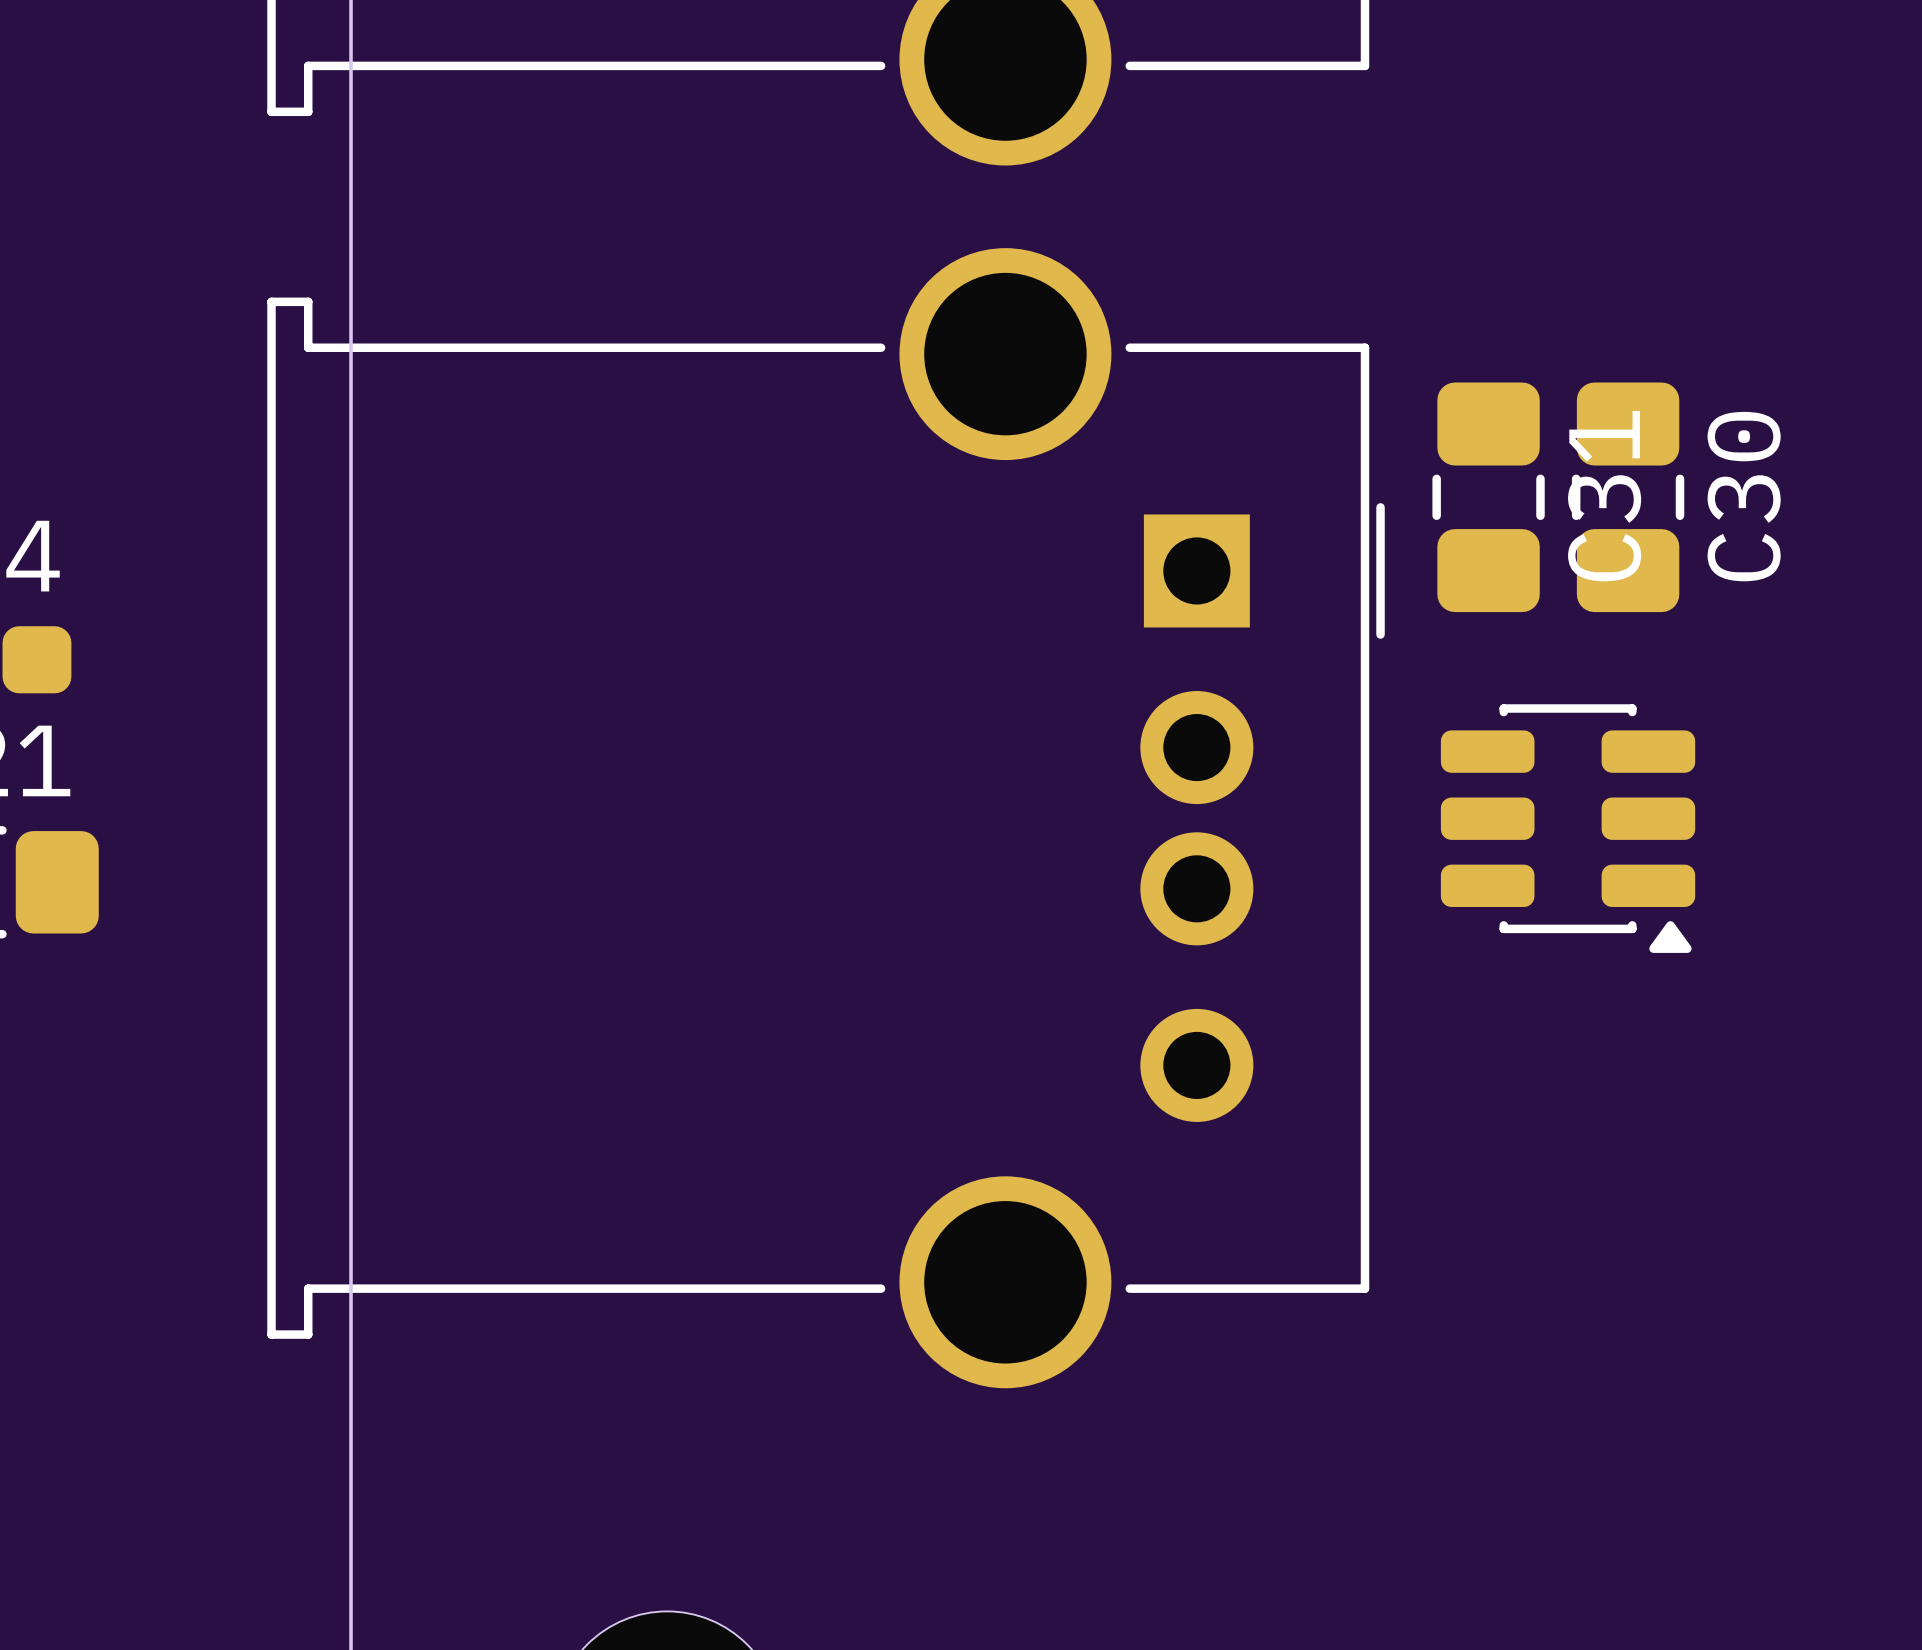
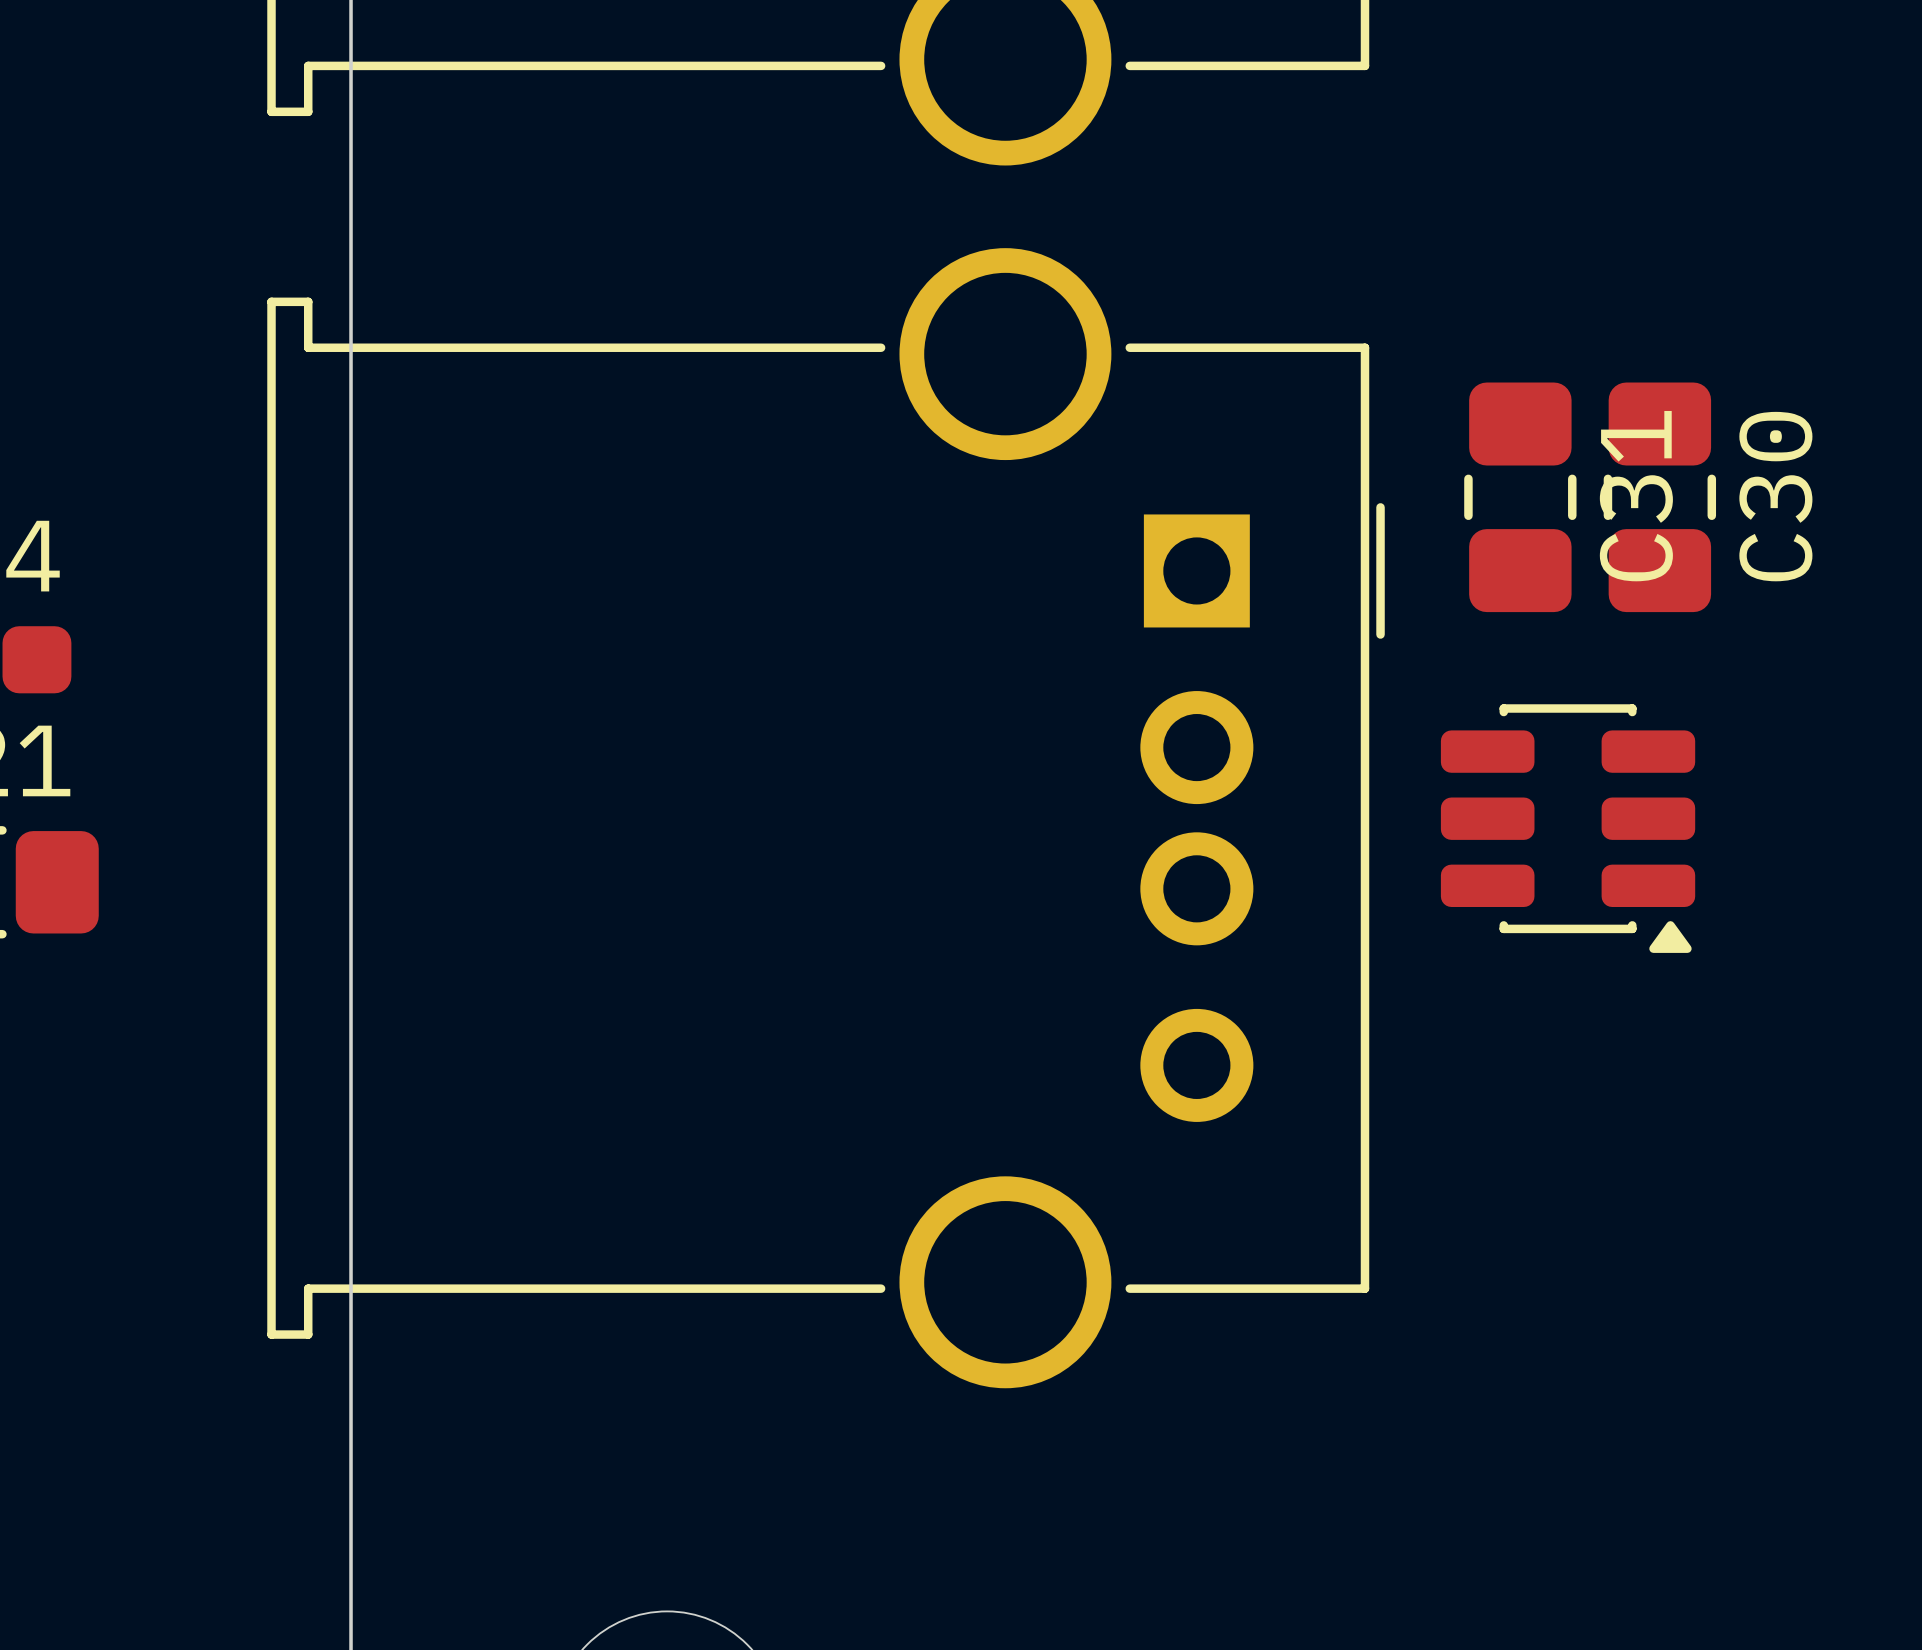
C31 position: (1488, 497) -> (1520, 497)
C30 position: (1628, 497) -> (1659, 497)

